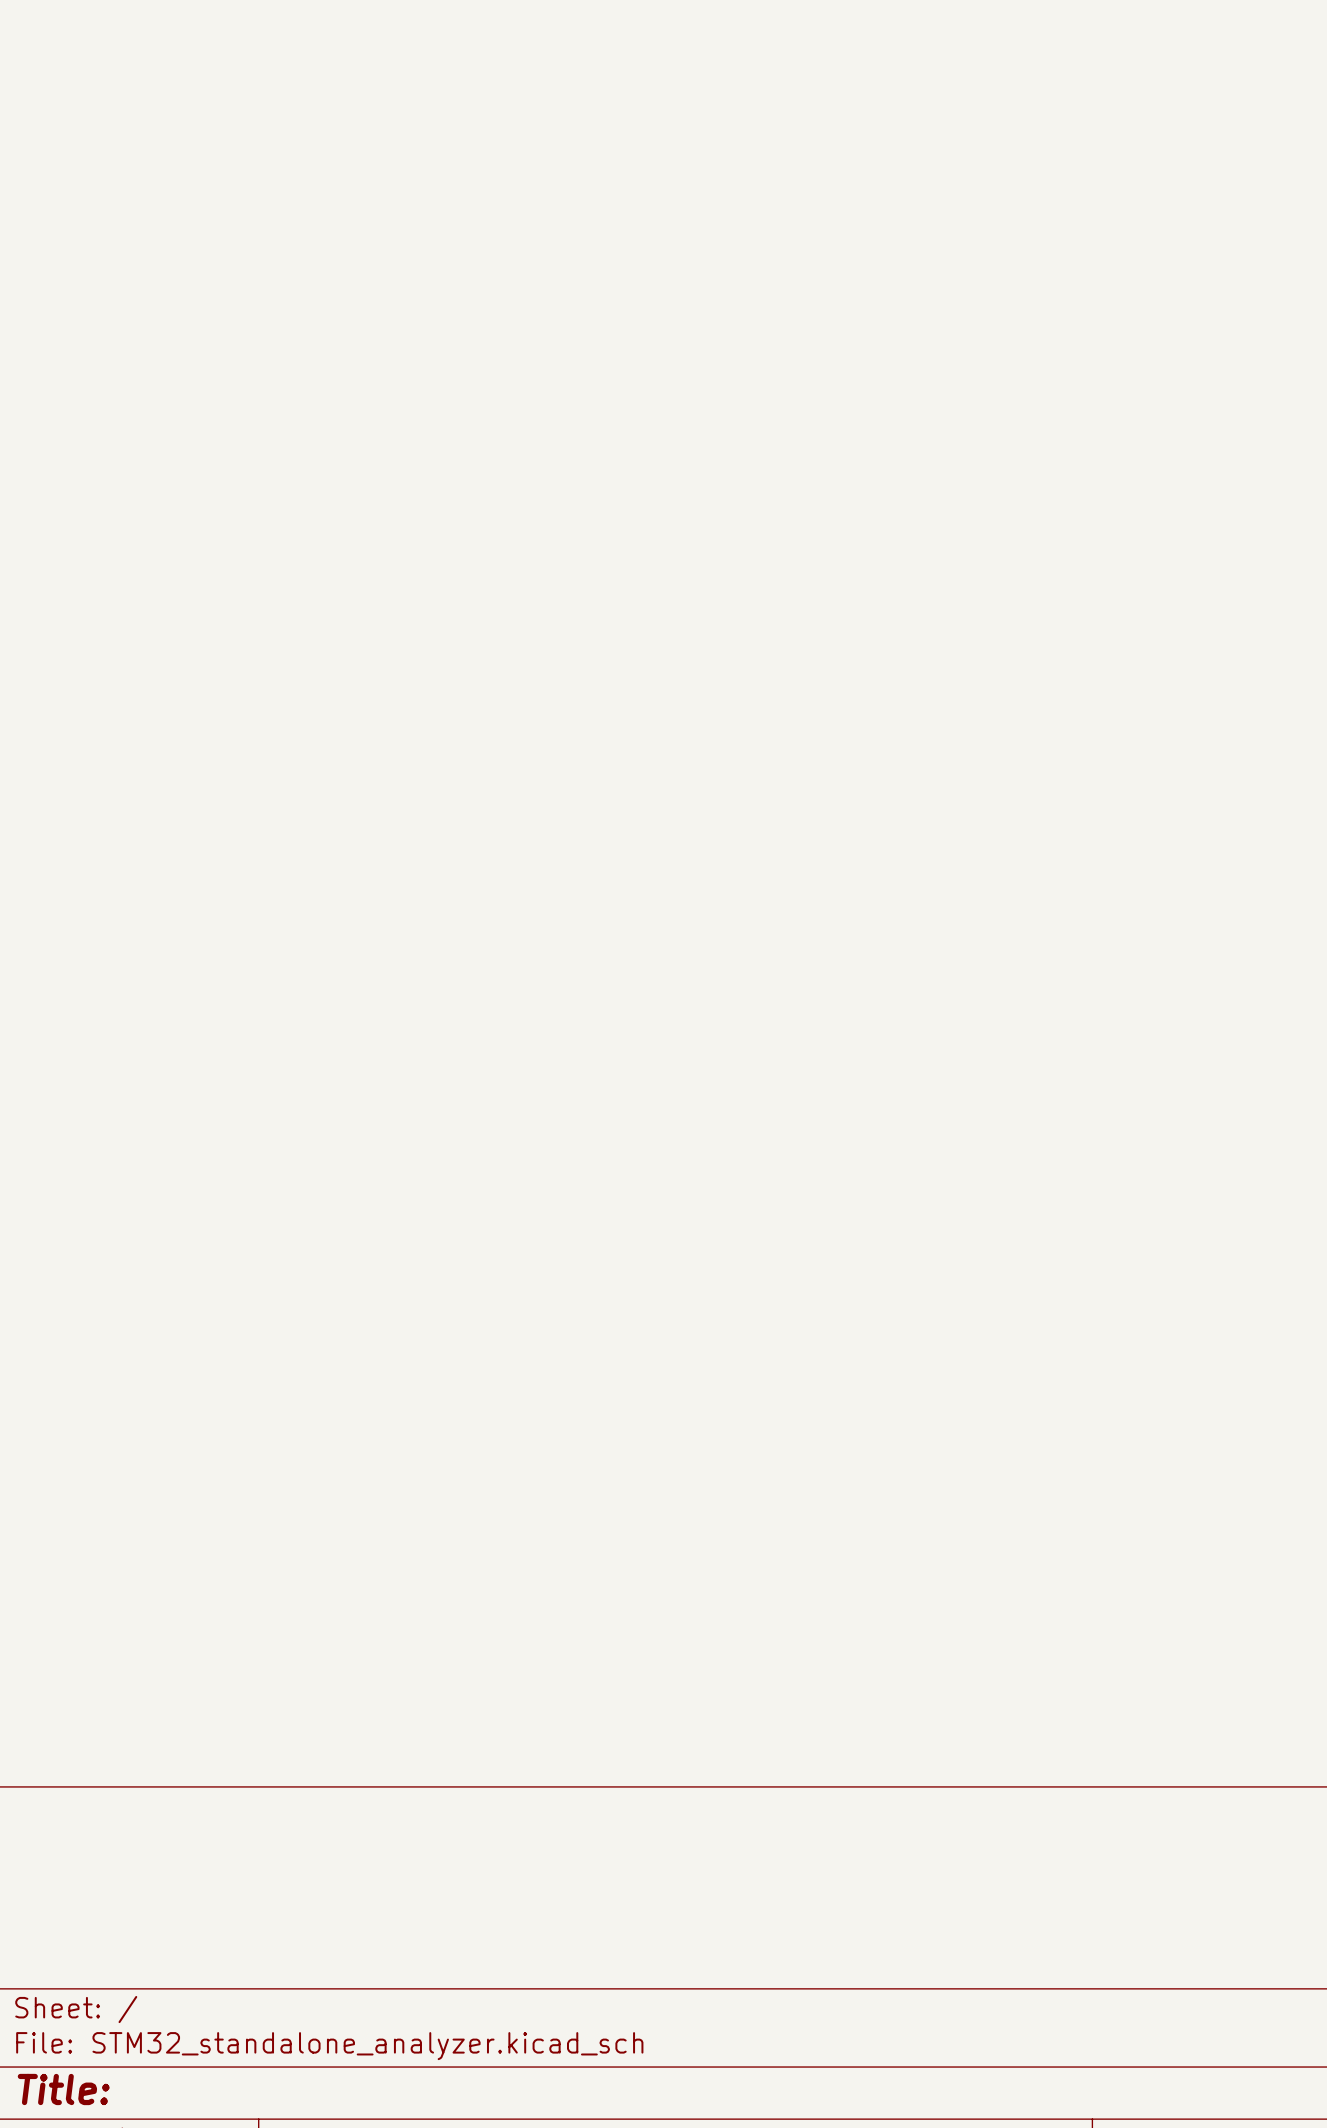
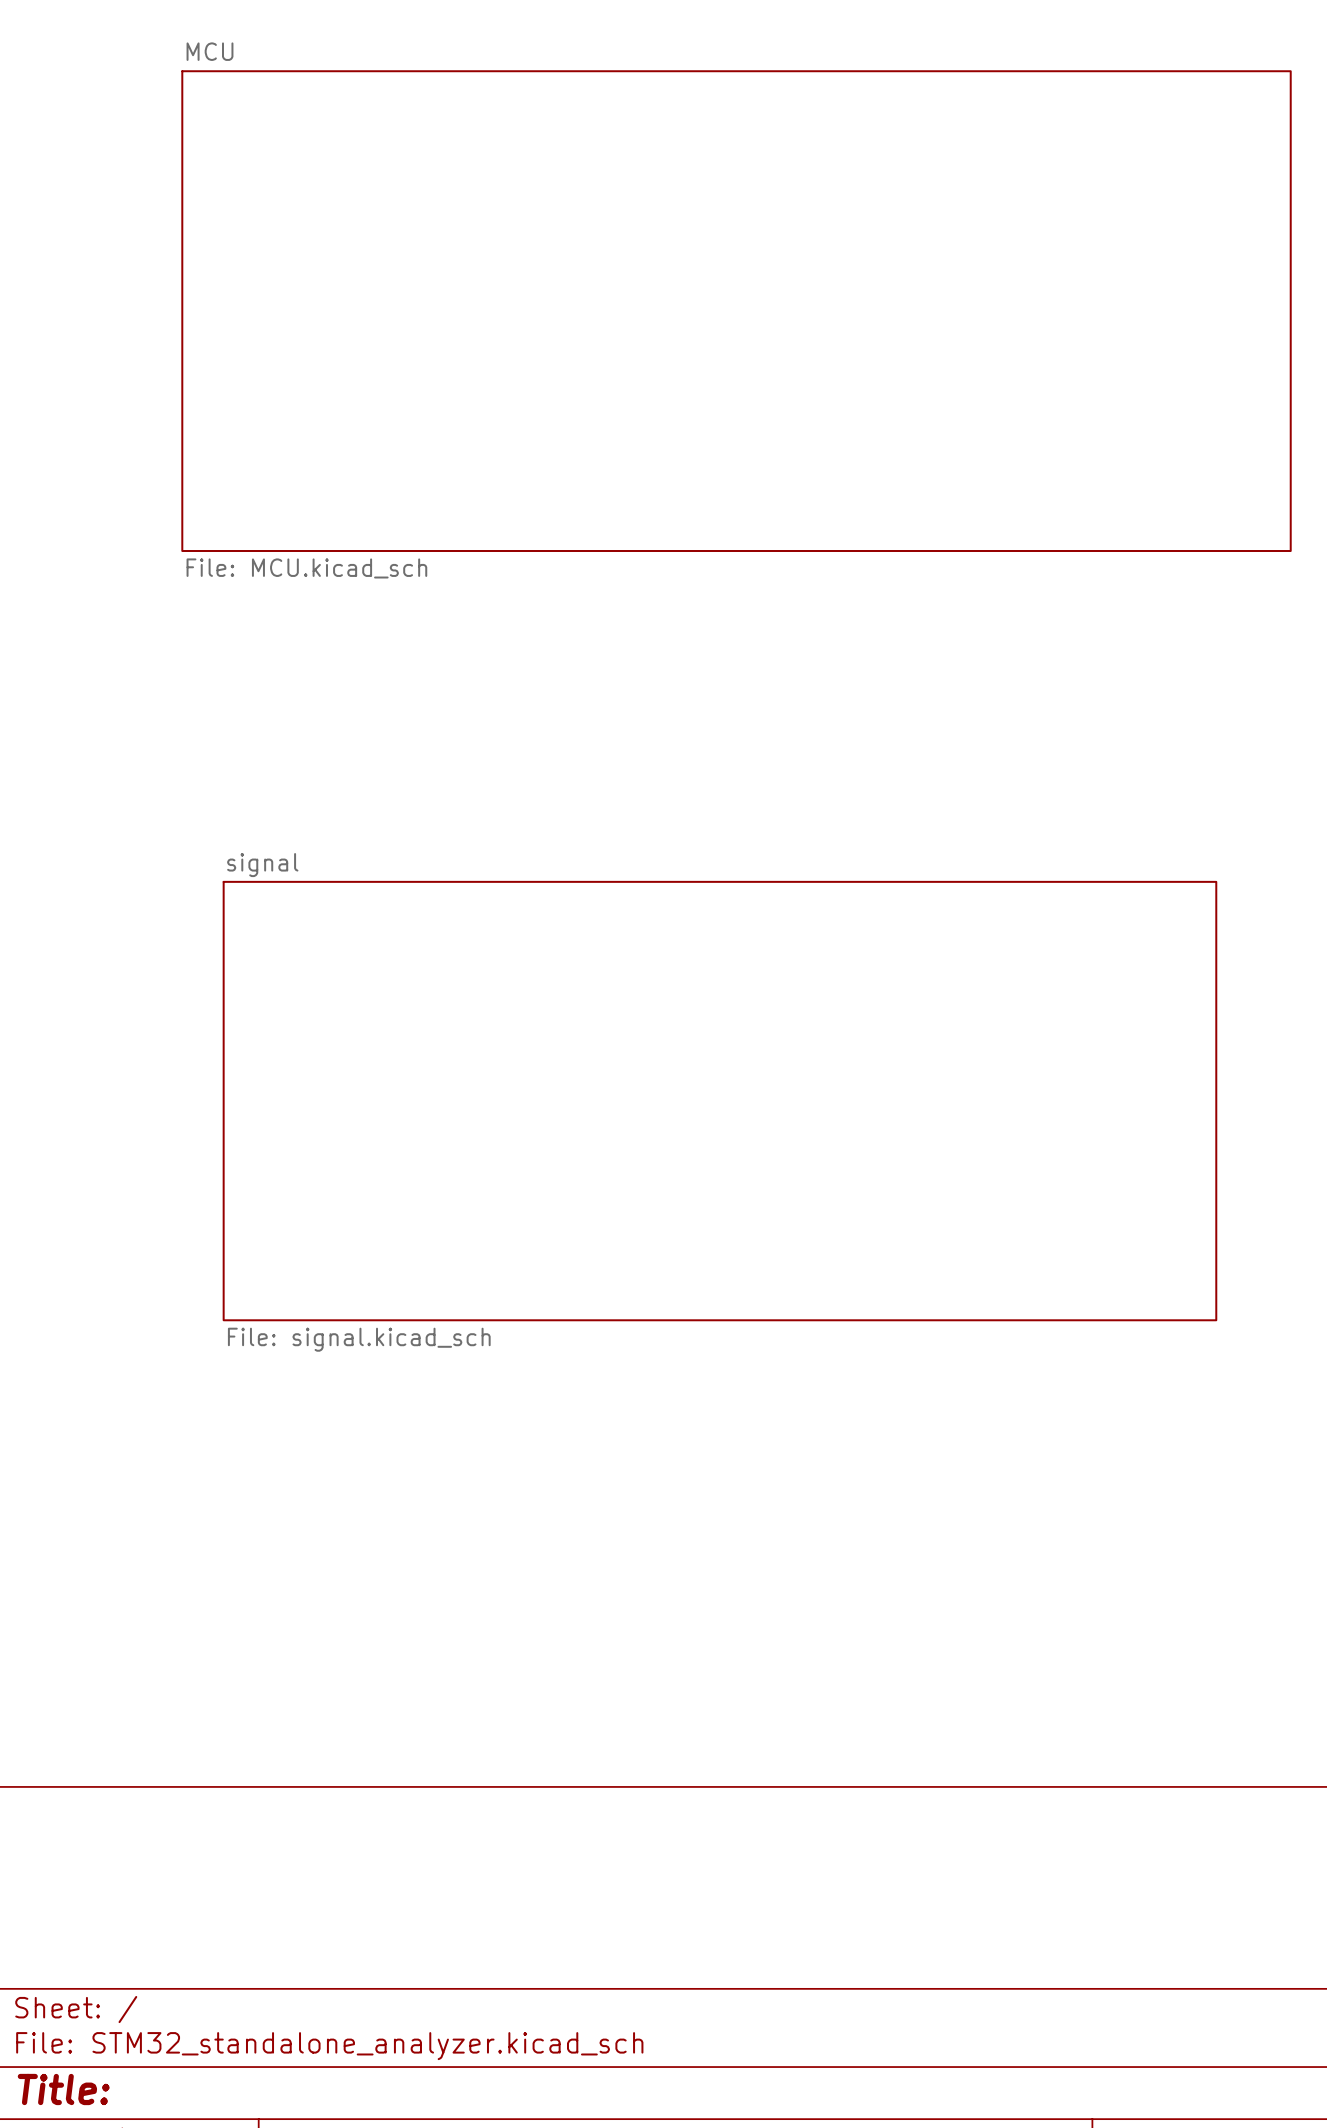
sheet MCU: none -> File: MCU.kicad_sch (736, 311)
sheet signal: none -> File: signal.kicad_sch (719, 1101)

